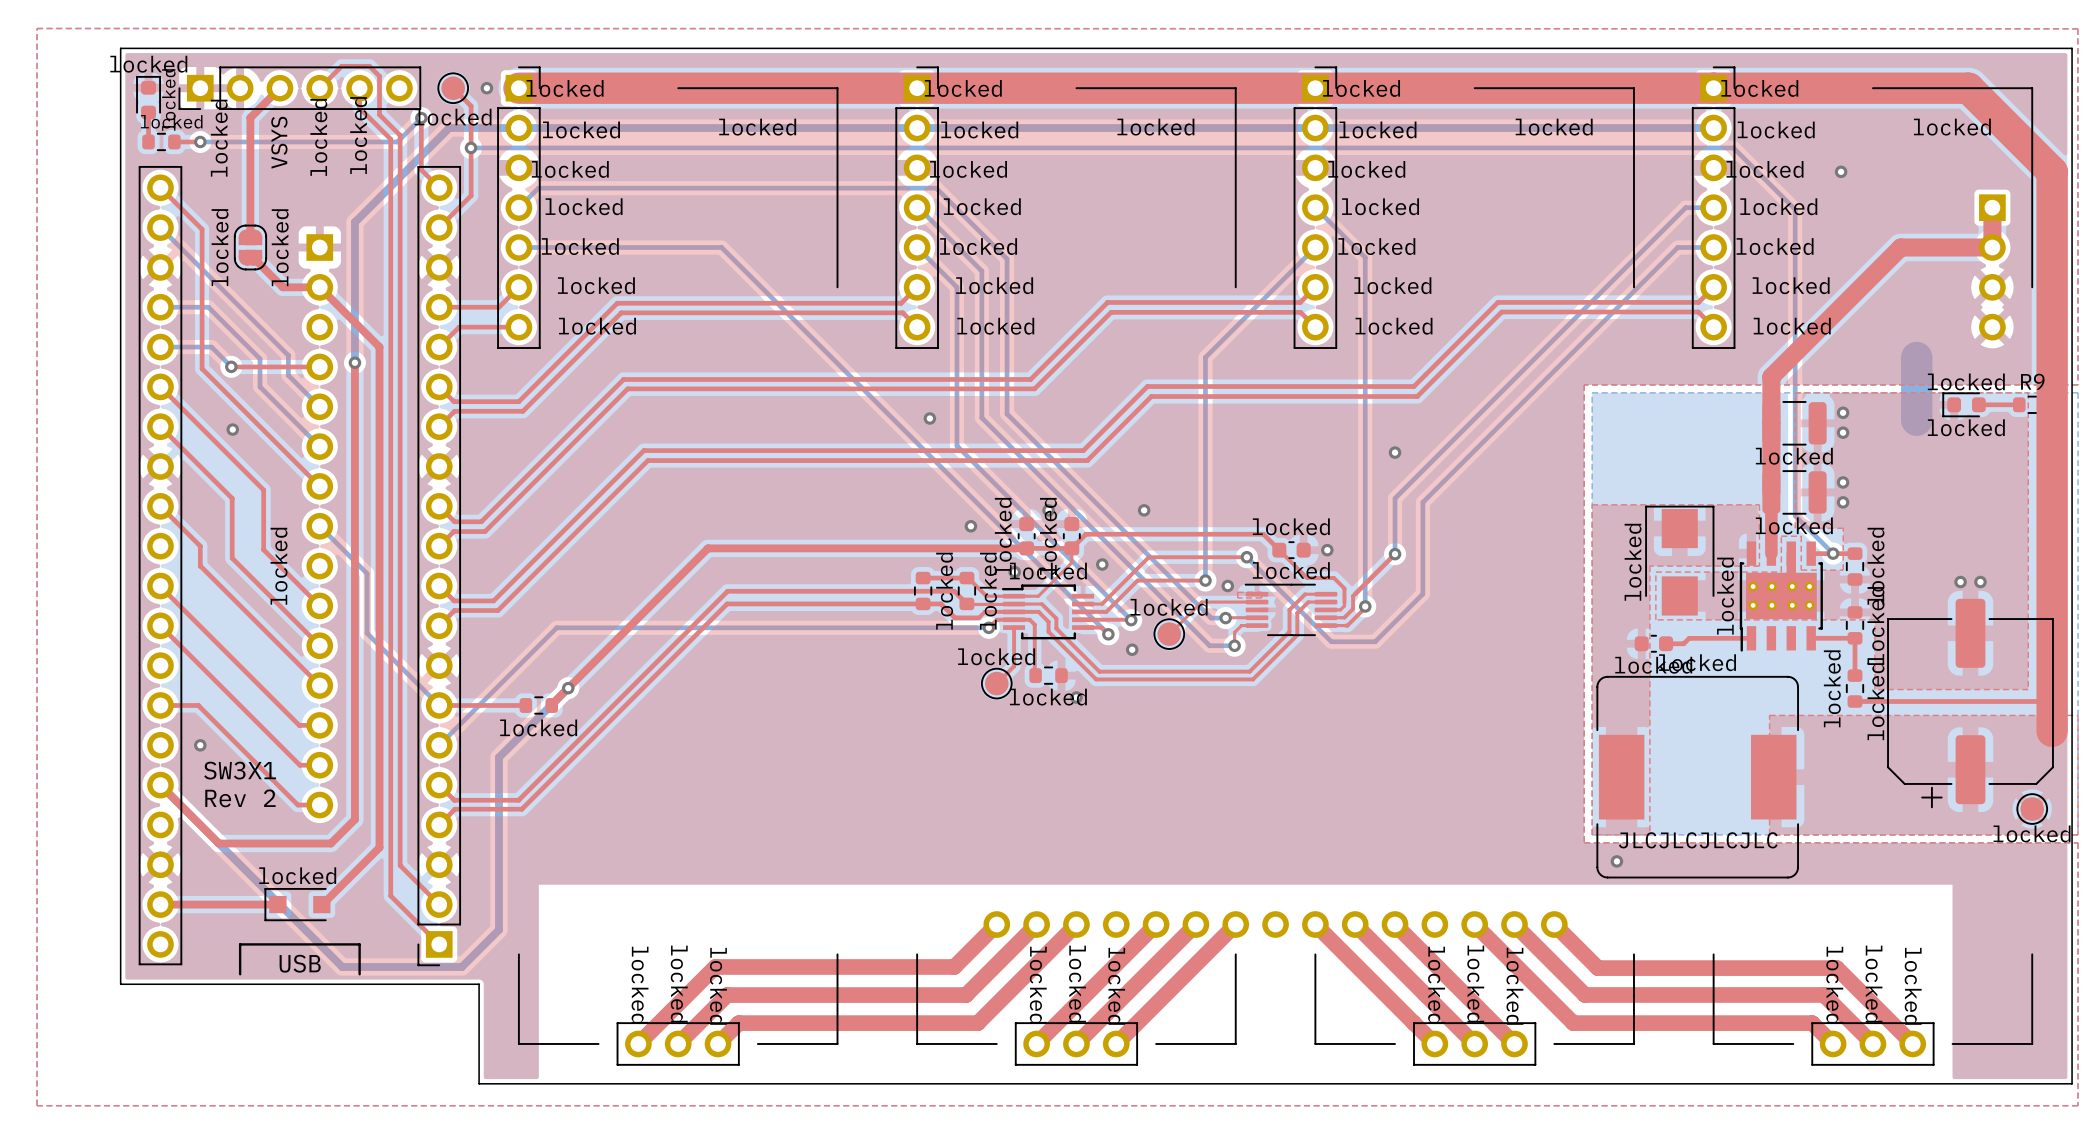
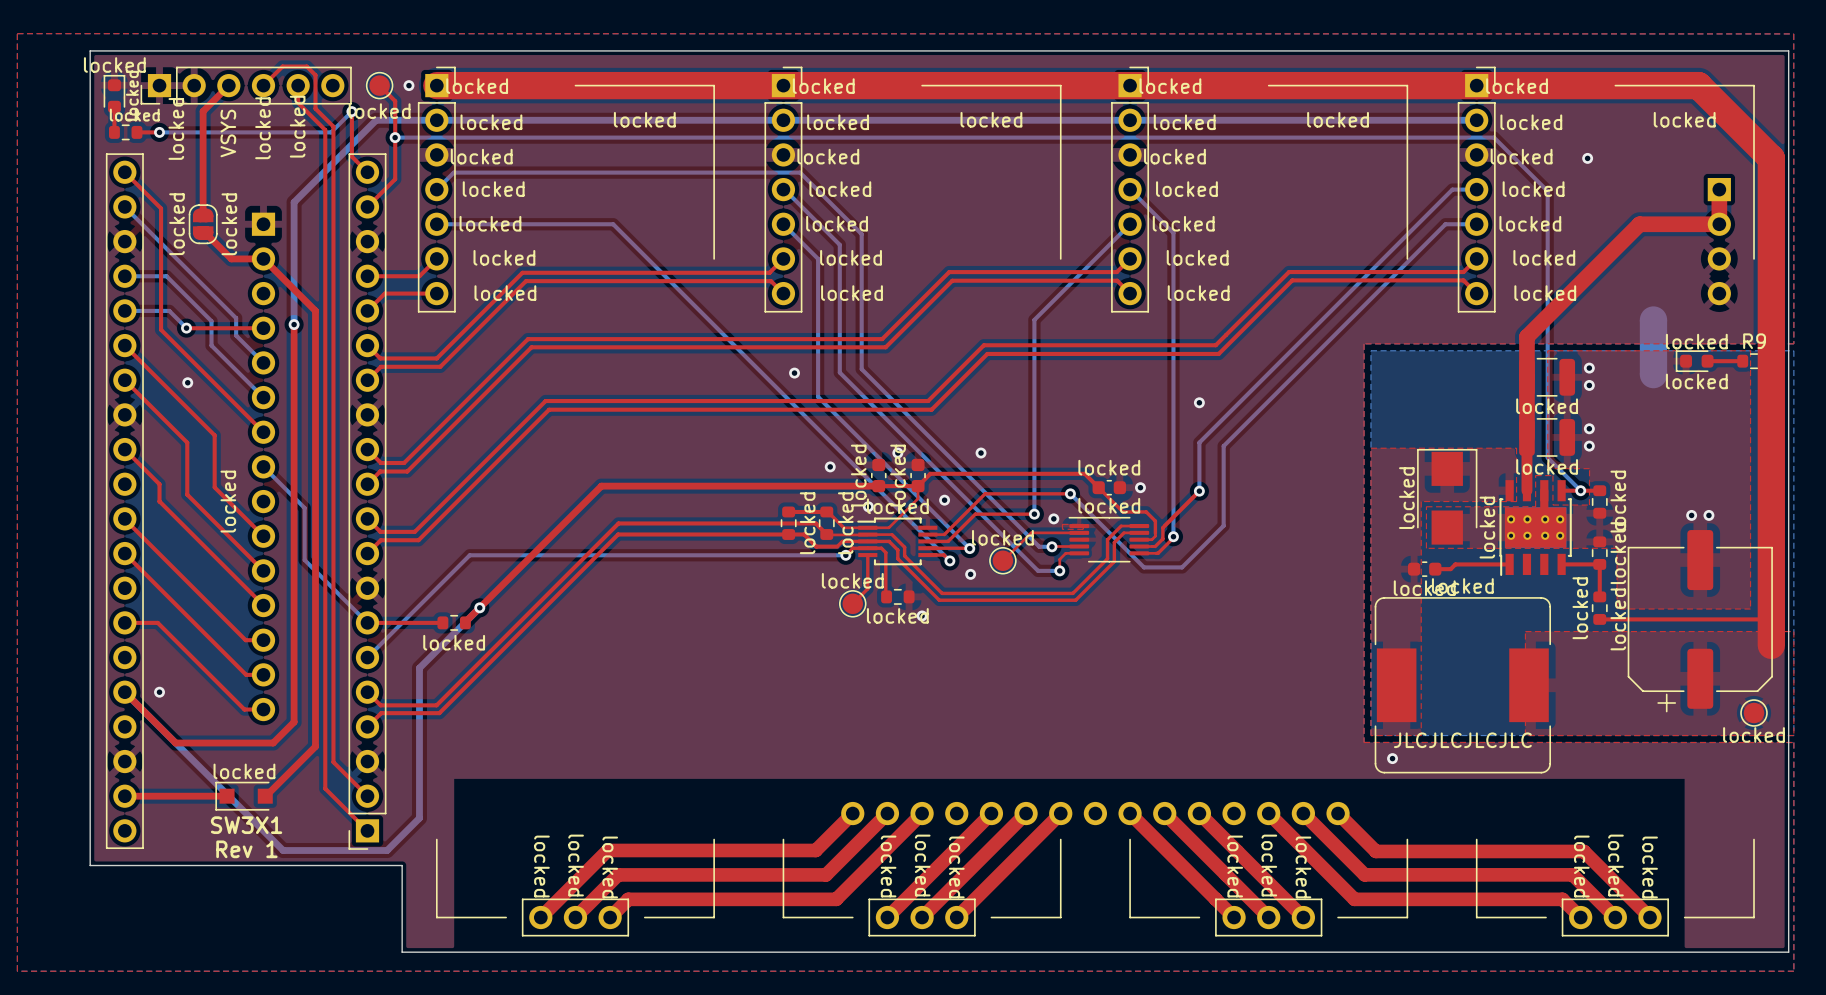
via position: (200, 745) -> (159, 692)
text position: SW3X1 (240, 770) -> SW3X1 (246, 825)
text: Rev 2 (240, 798) -> none
text: USB (300, 963) -> Rev 1 (246, 849)
line: (240, 974) (240, 944) (359, 944) (359, 974) -> none

